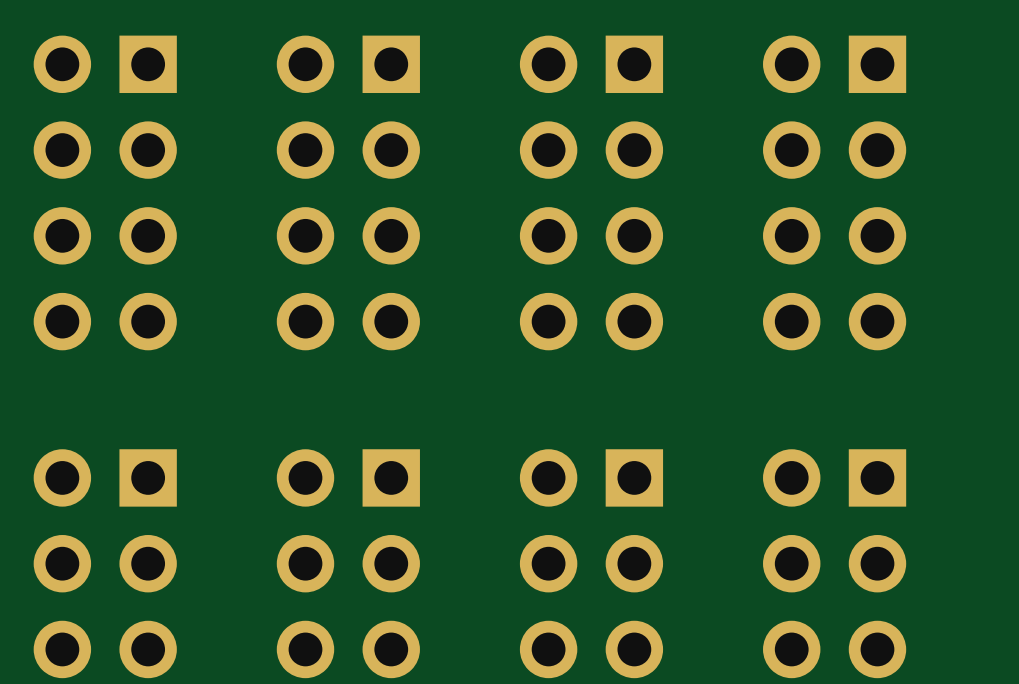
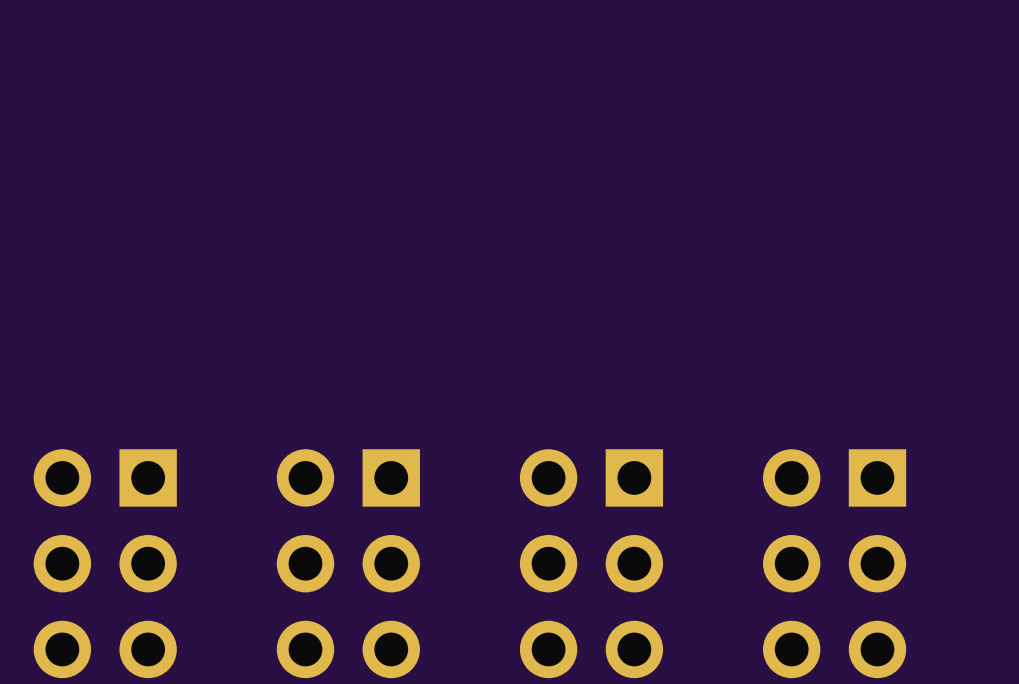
part: (105, 192) -> none
part: (348, 192) -> none
part: (591, 192) -> none
part: (834, 192) -> none

